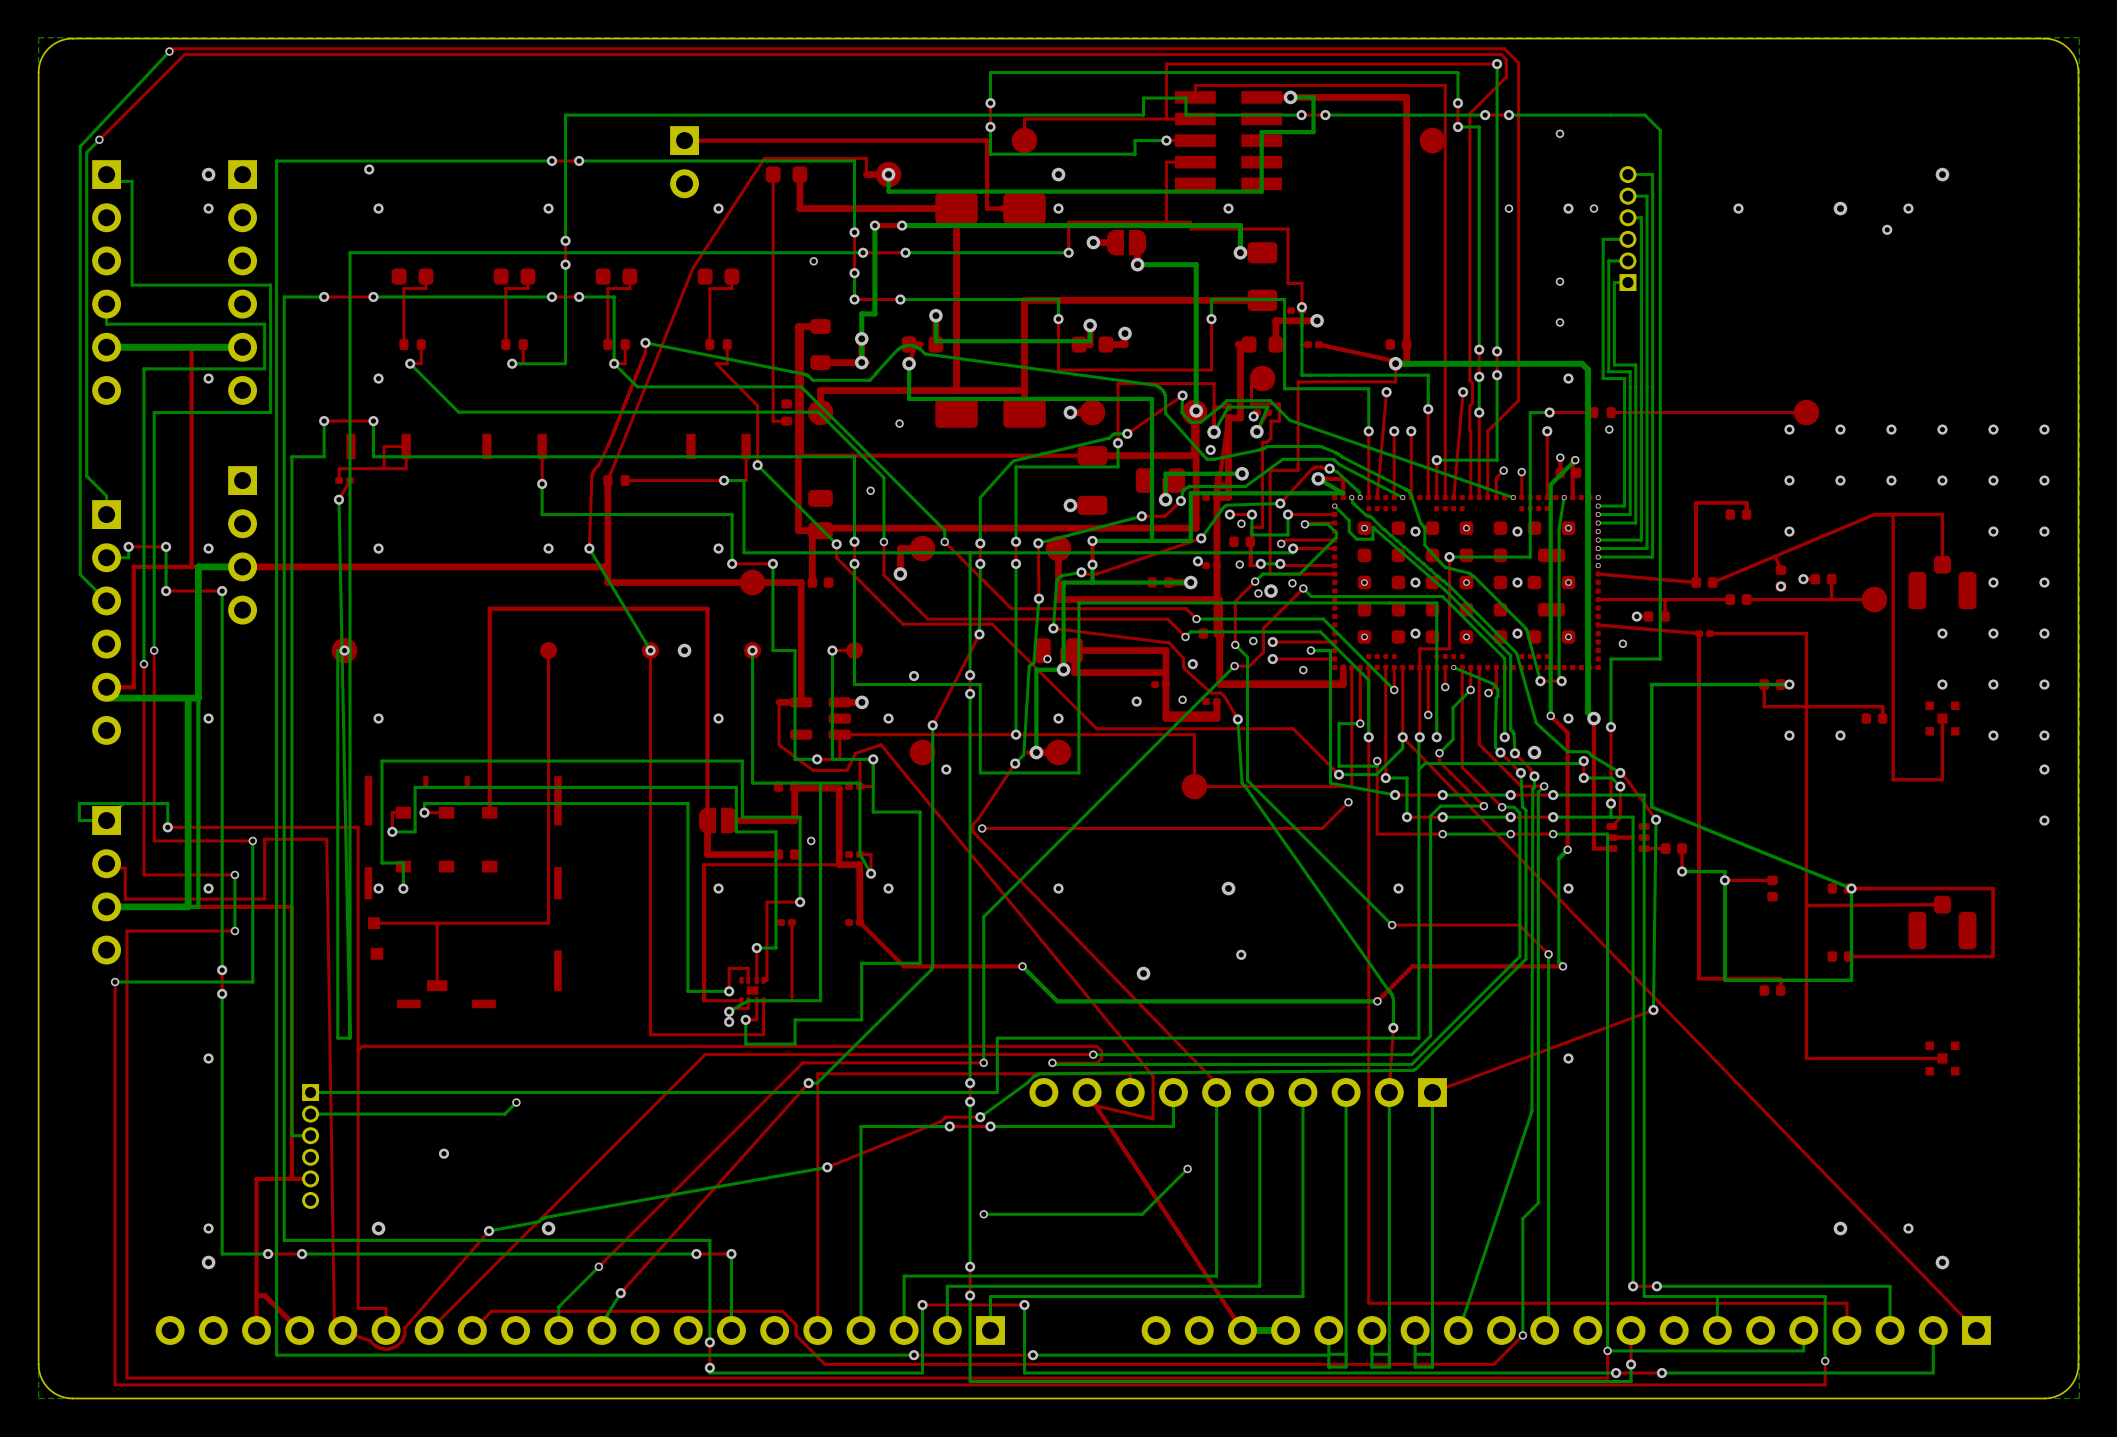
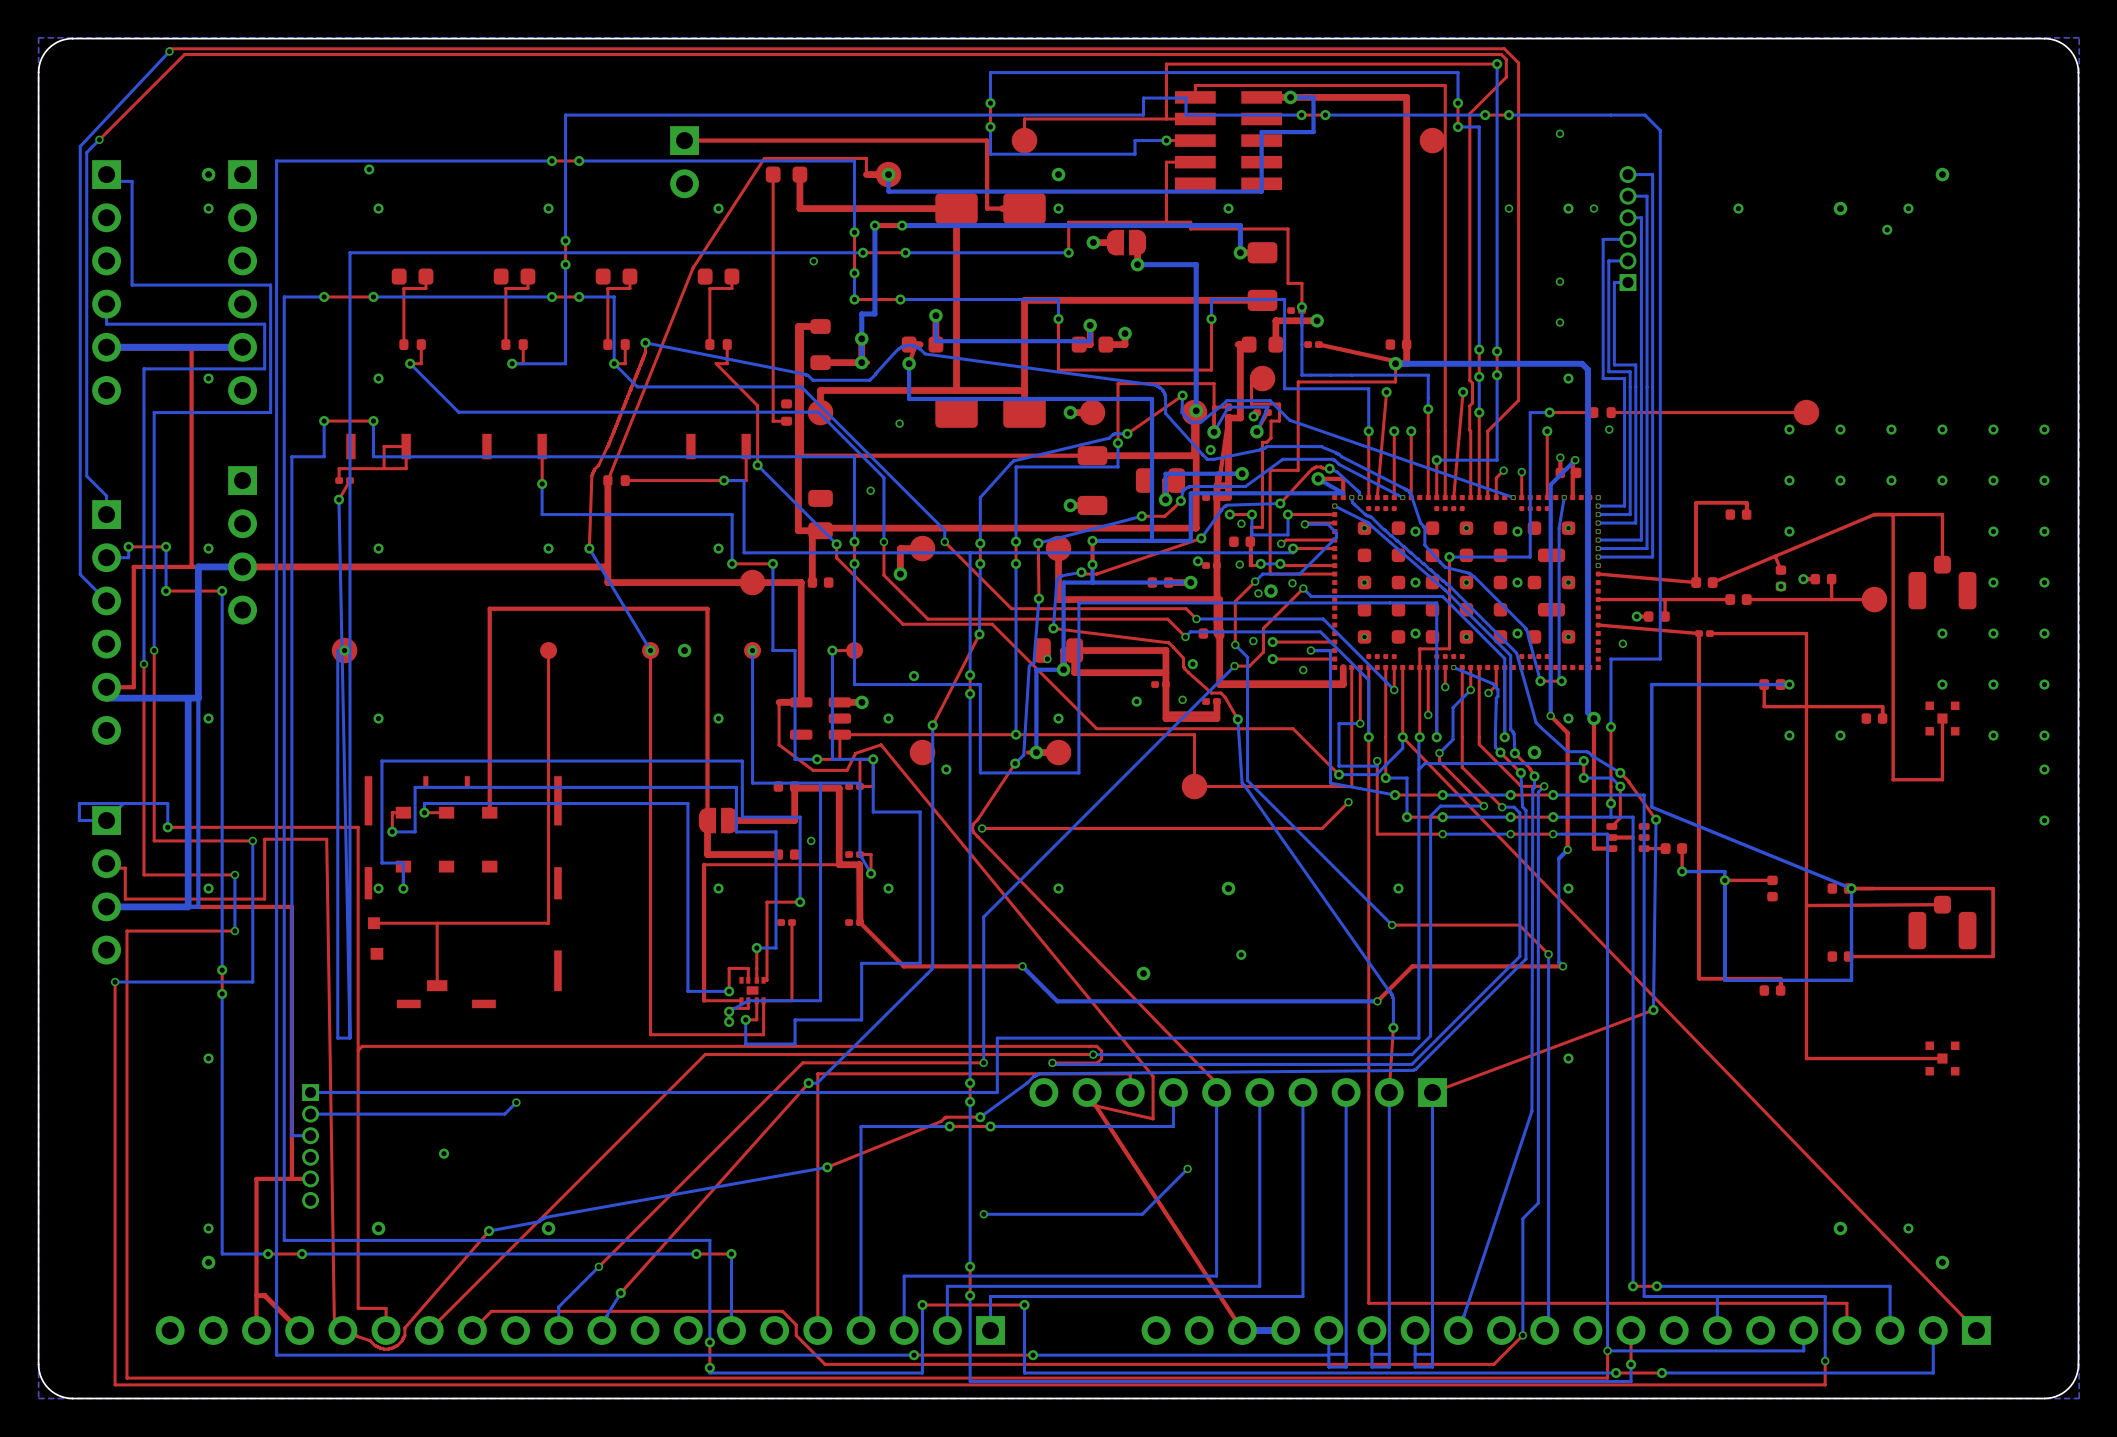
bottom track: (1334, 506) (1349, 520) (1349, 531) (1356, 539) (1373, 539) (1373, 527) -> (1334, 506) (1368, 523) (1373, 527)

